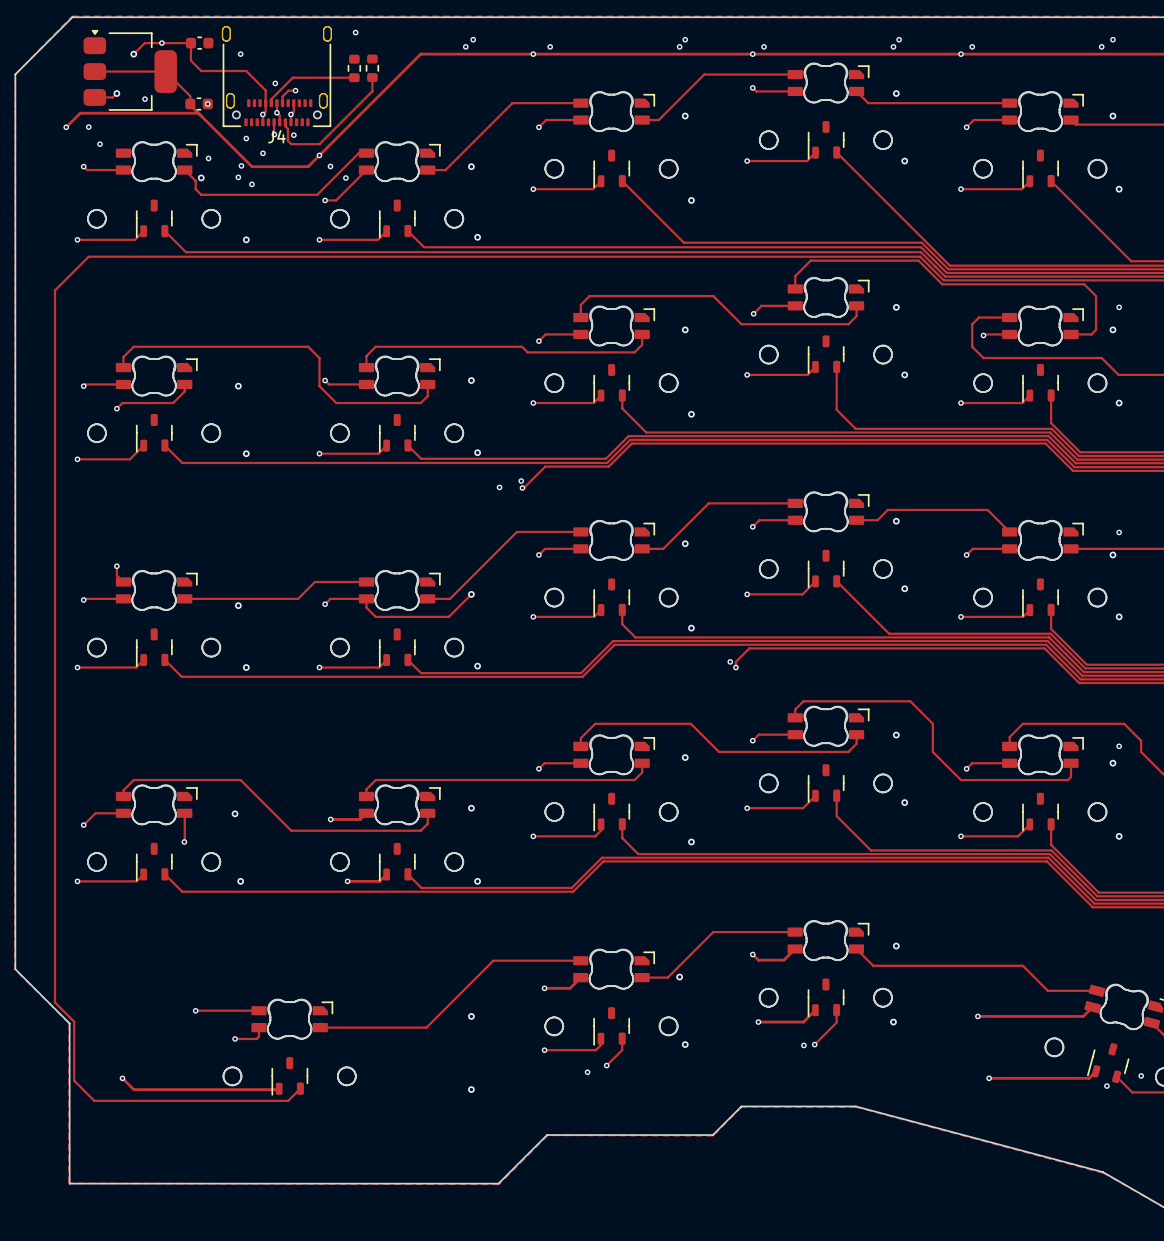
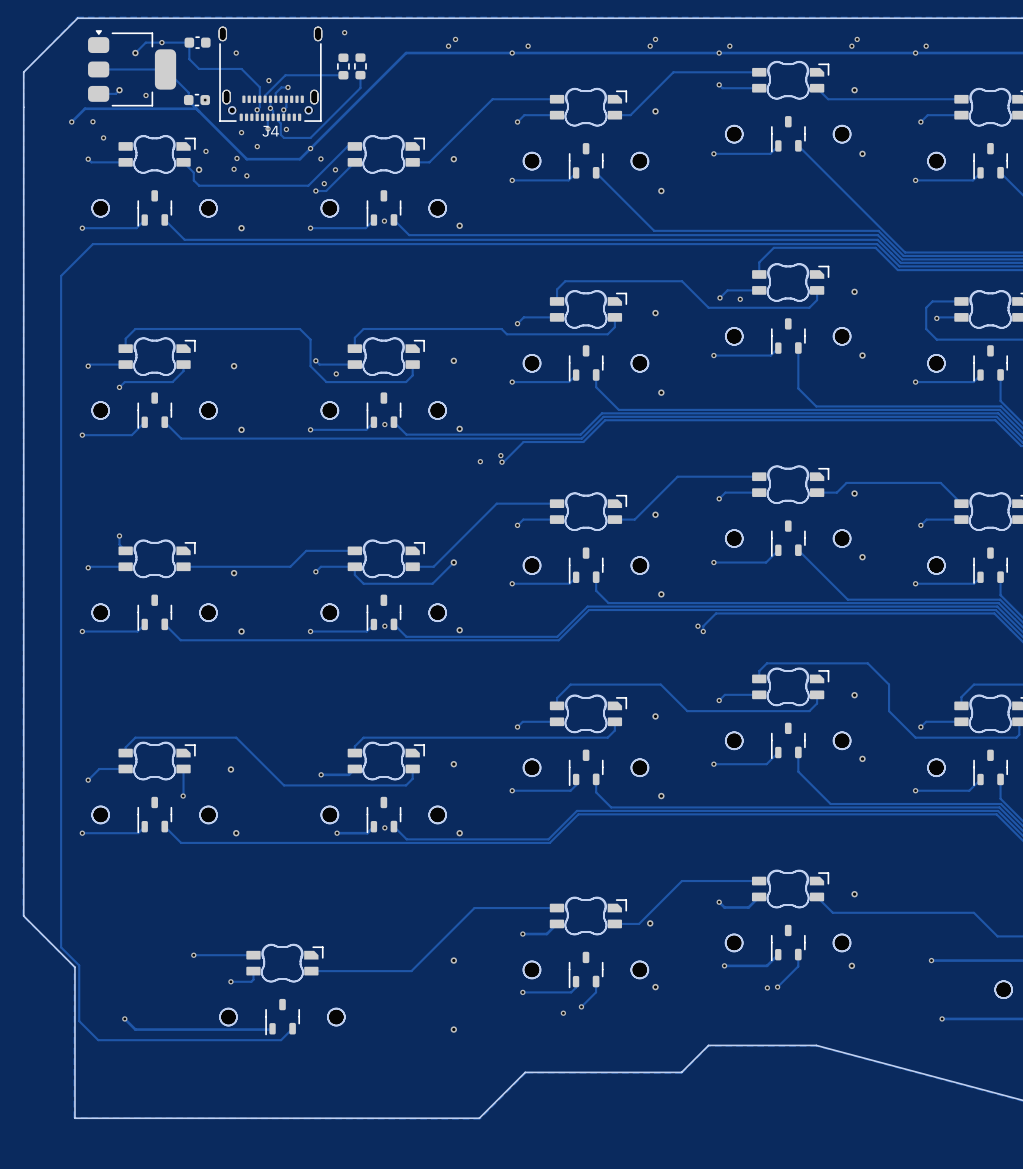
via: none -> (324, 183)
via: none -> (384, 221)
via: none -> (740, 299)
via: none -> (336, 373)
via: none -> (384, 424)
via: none -> (384, 626)
via: none -> (384, 827)

